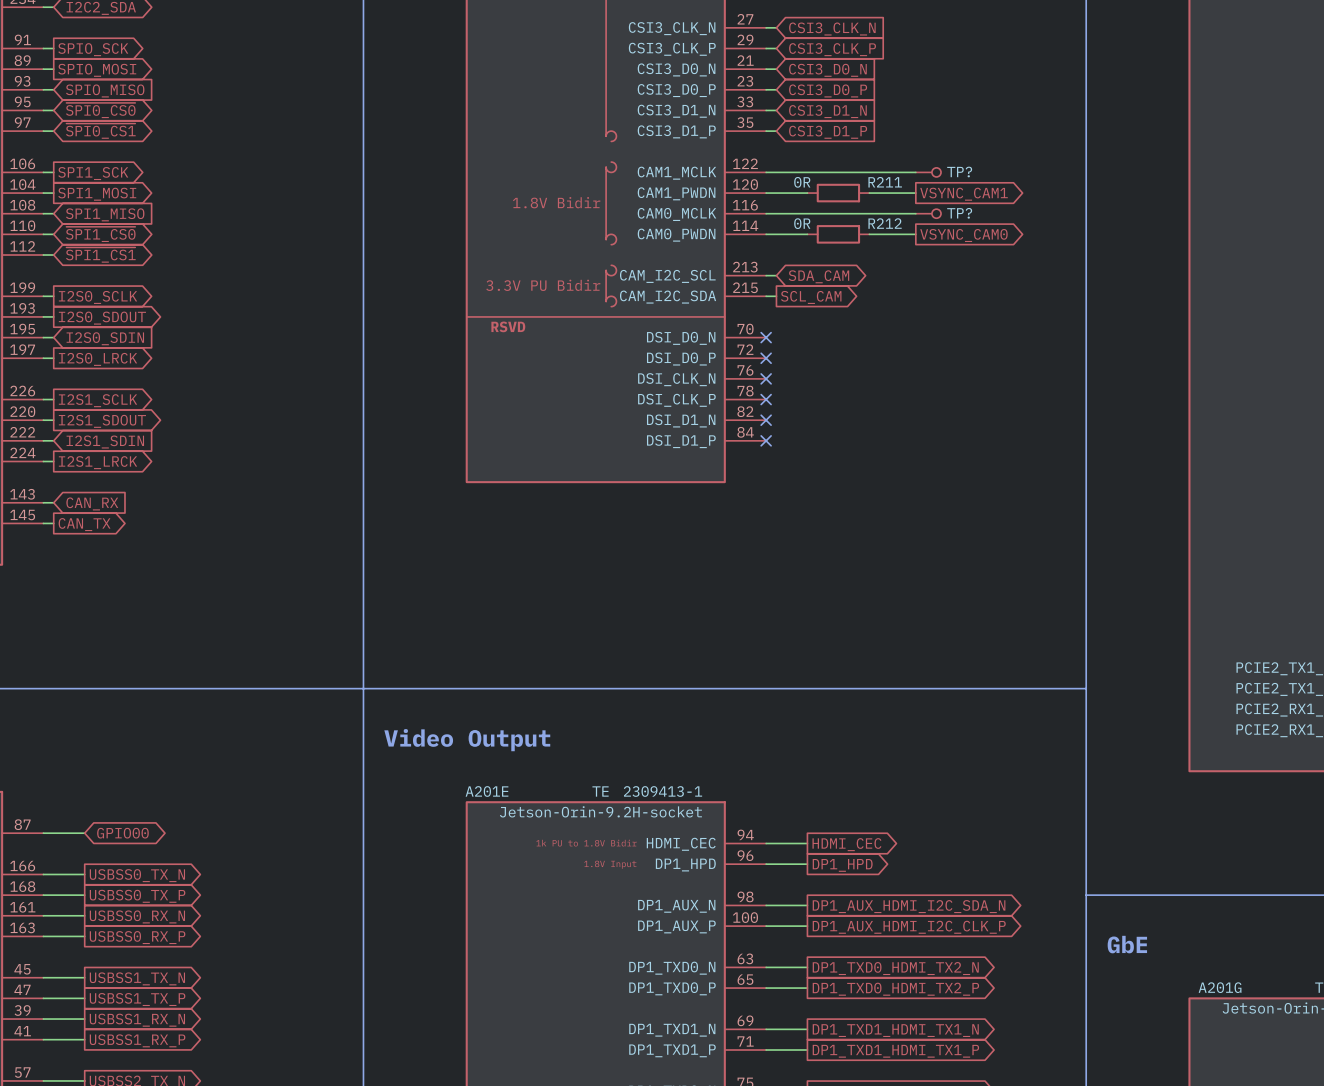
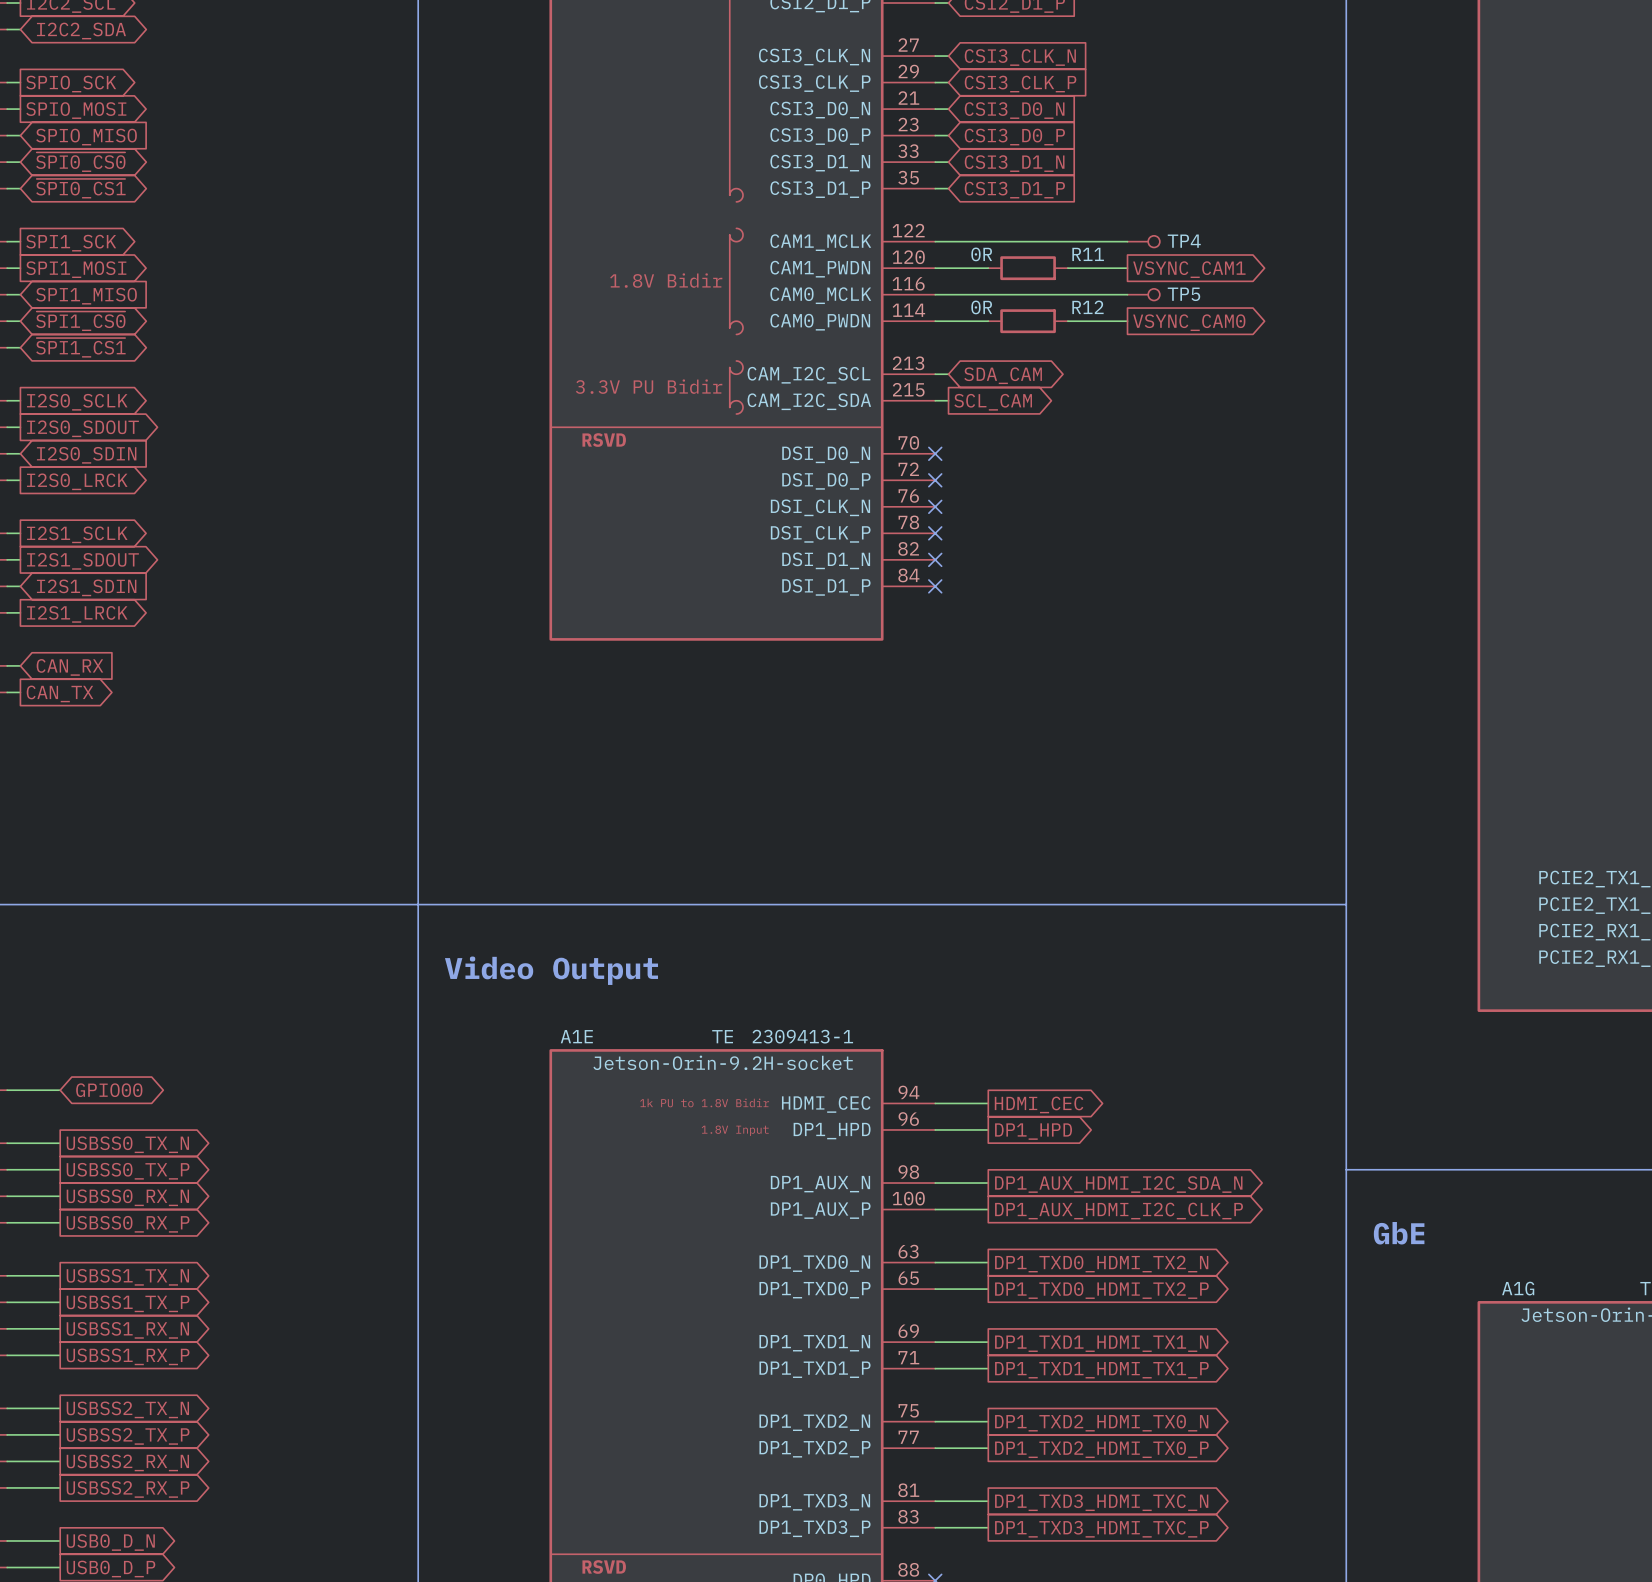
TP? name: TP? (959, 172) -> TP4 (1184, 241)
R211 name: R211 (885, 182) -> R11 (1088, 254)
TP? name: TP? (959, 213) -> TP5 (1183, 294)
R212 name: R212 (885, 223) -> R12 (1087, 307)
A201E name: A201E (487, 791) -> A1E (576, 1036)
A201G name: A201G (1220, 987) -> A1G (1518, 1288)

